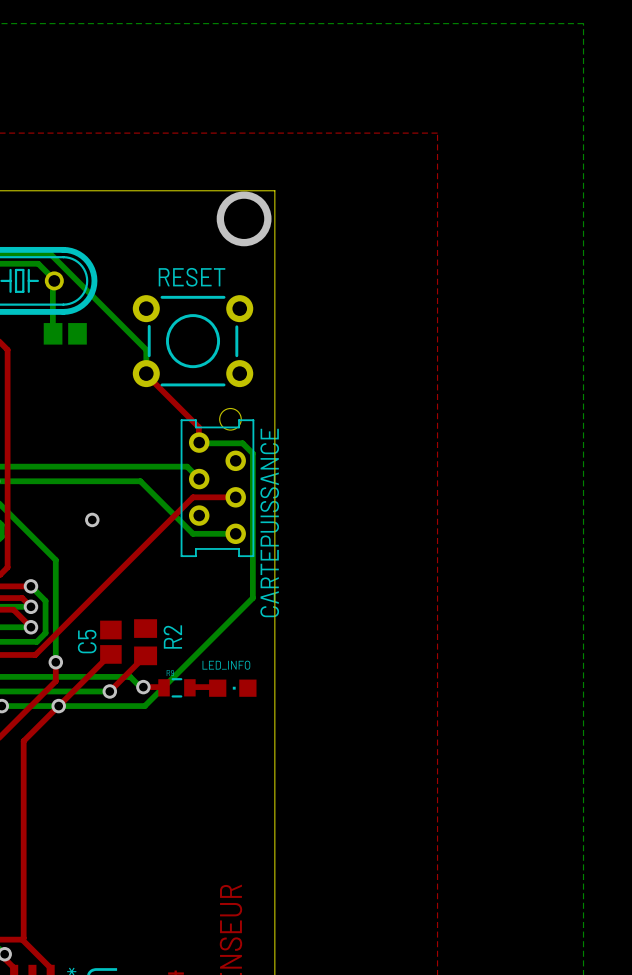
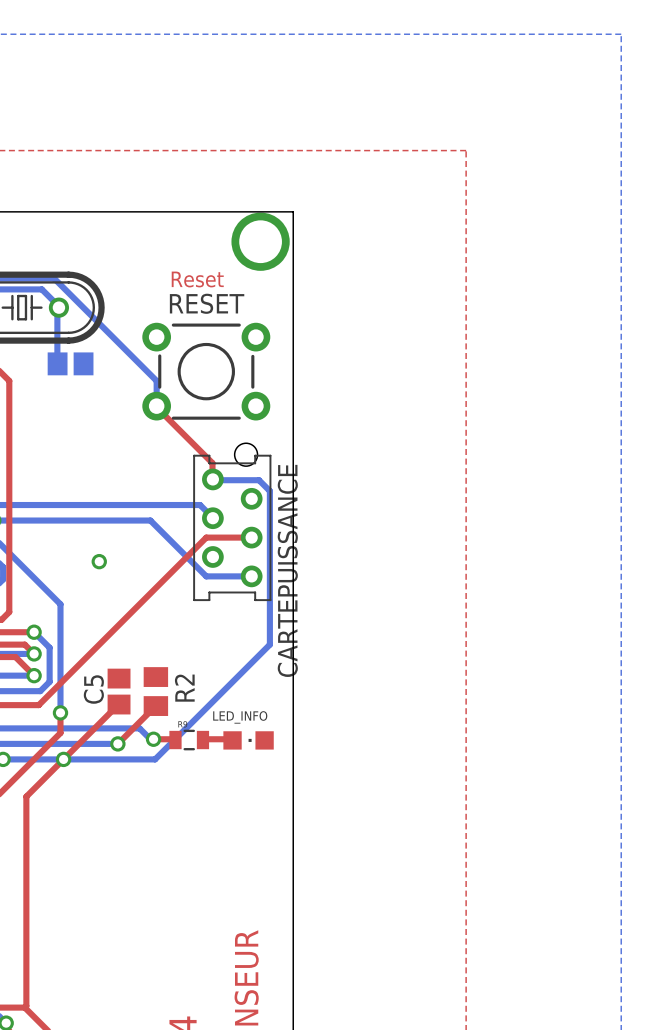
text: none -> Reset (197, 279)

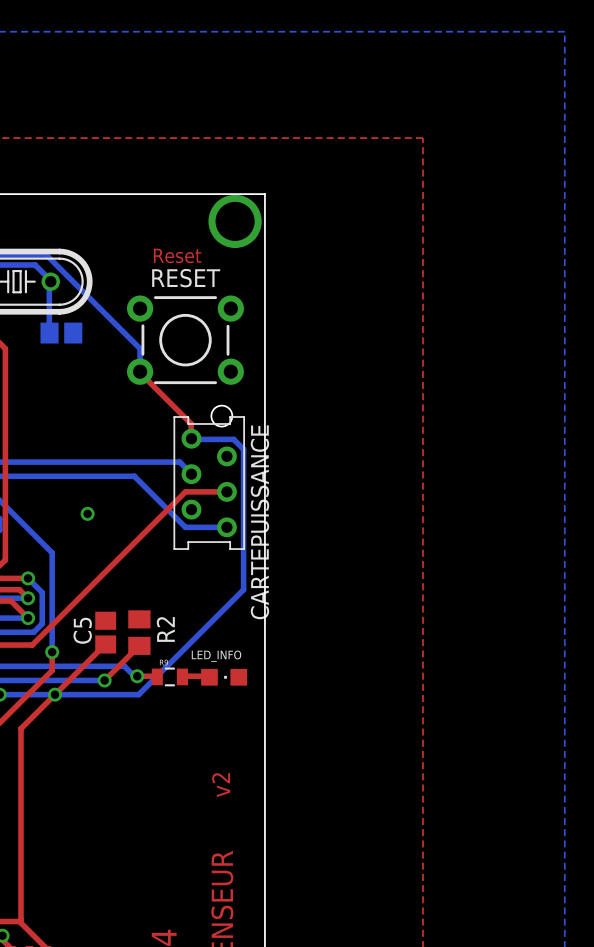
text: none -> v2 (221, 785)

